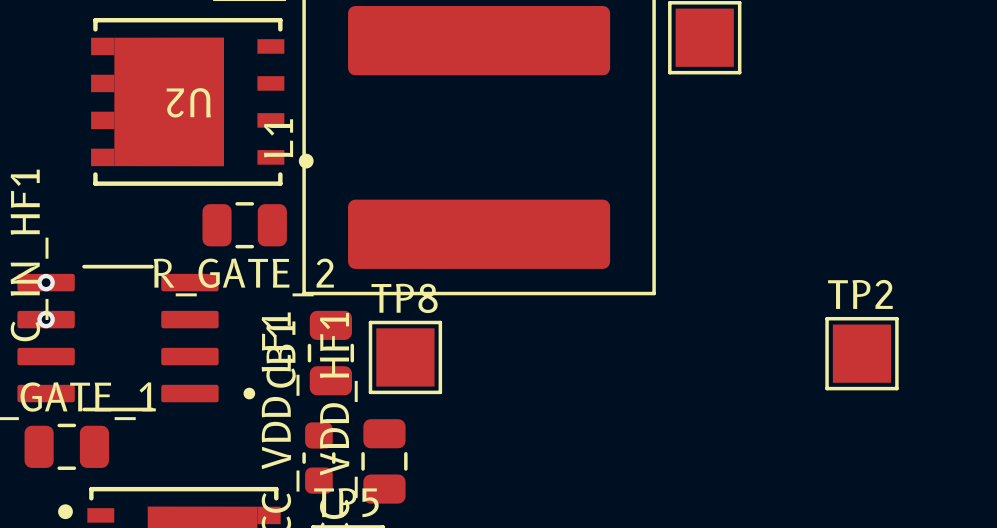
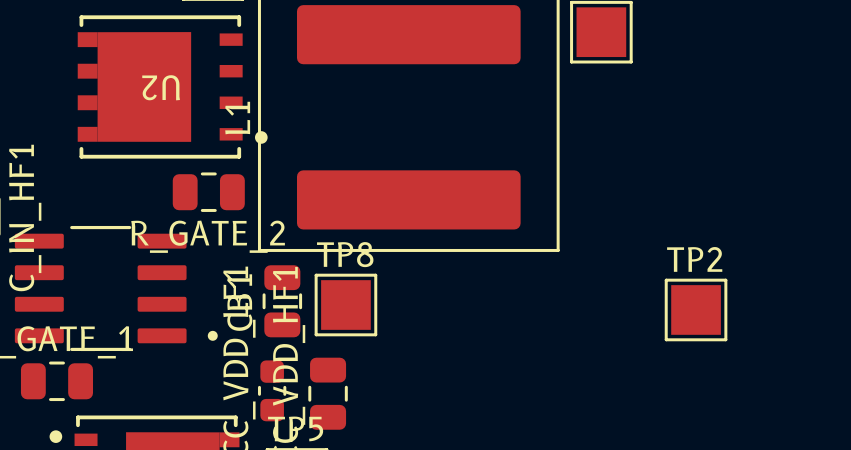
via: (46, 282) -> none
via: (46, 319) -> none
TP2 position: (861, 353) -> (696, 309)

